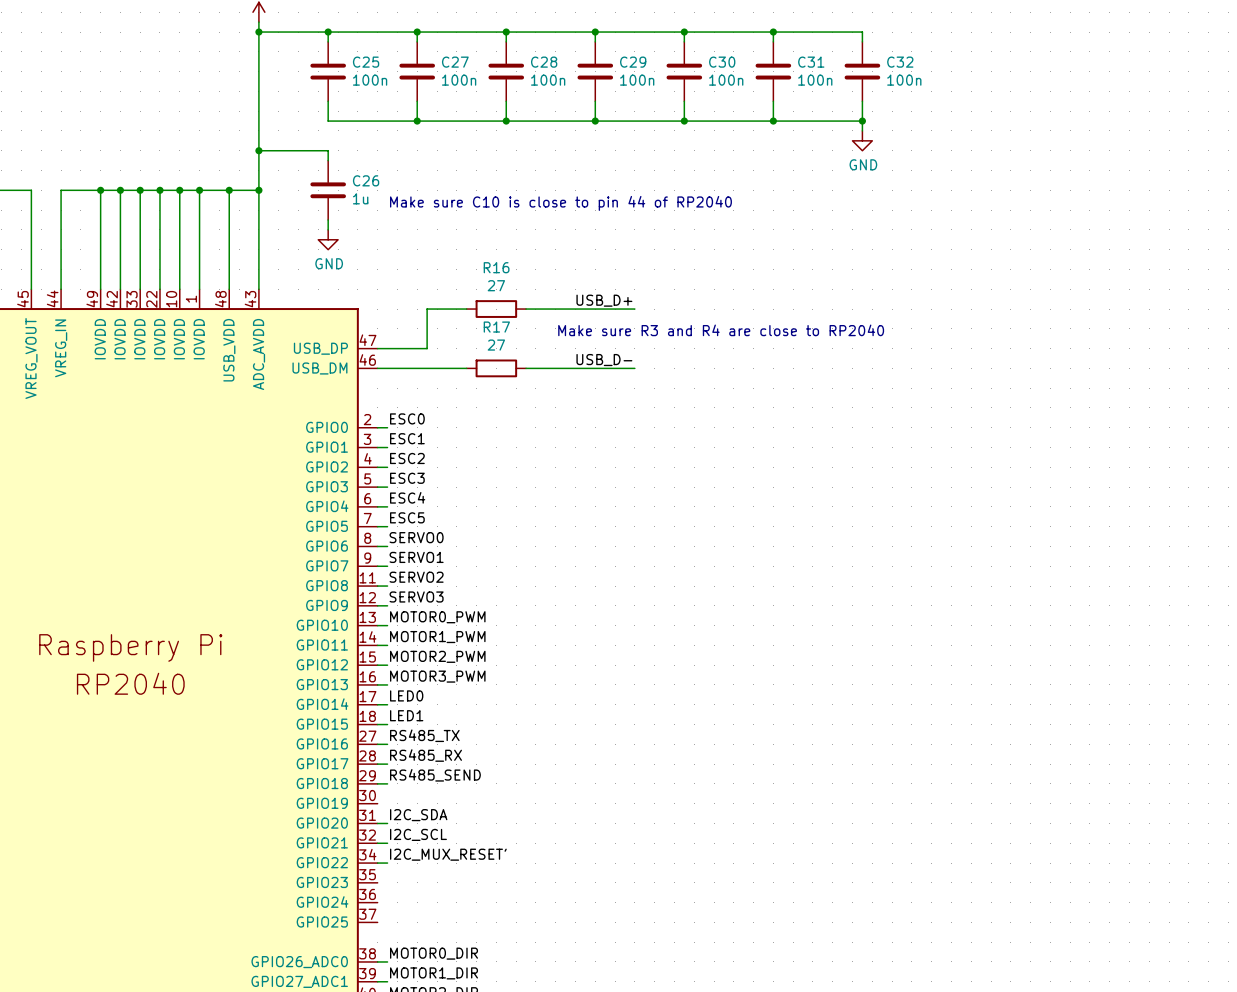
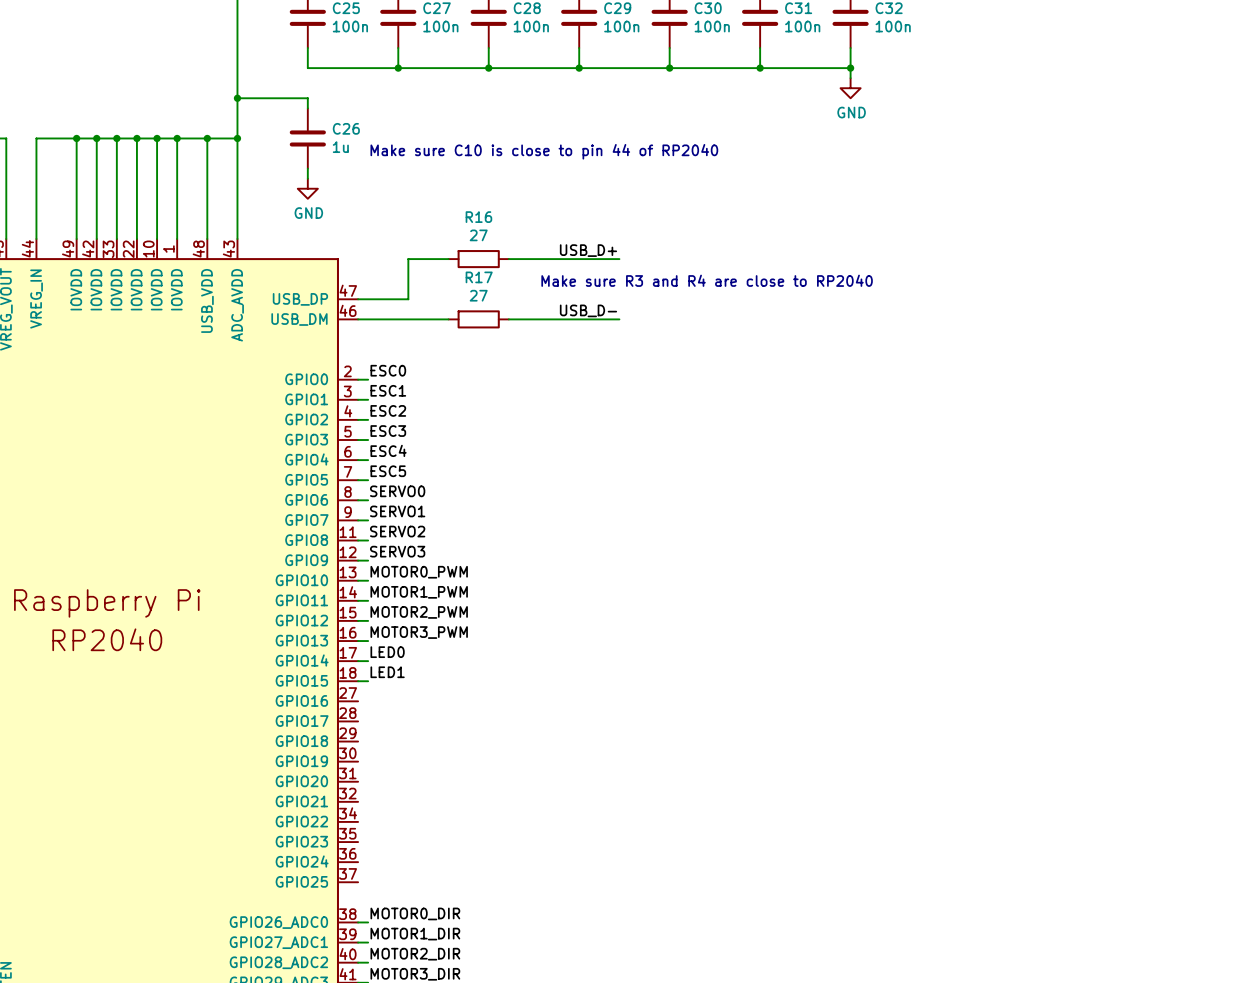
label: RS485_TX (424, 735) -> none
wire: (377, 744) (387, 744) -> none
label: RS485_RX (426, 755) -> none
wire: (377, 764) (387, 764) -> none
label: RS485_SEND (435, 775) -> none
wire: (377, 783) (387, 783) -> none
label: I2C_SDA (418, 815) -> none
wire: (377, 823) (387, 823) -> none
label: I2C_SCL (418, 834) -> none
wire: (377, 843) (387, 843) -> none
label: I2C_MUX_RESET' (448, 854) -> none
wire: (377, 863) (387, 863) -> none

